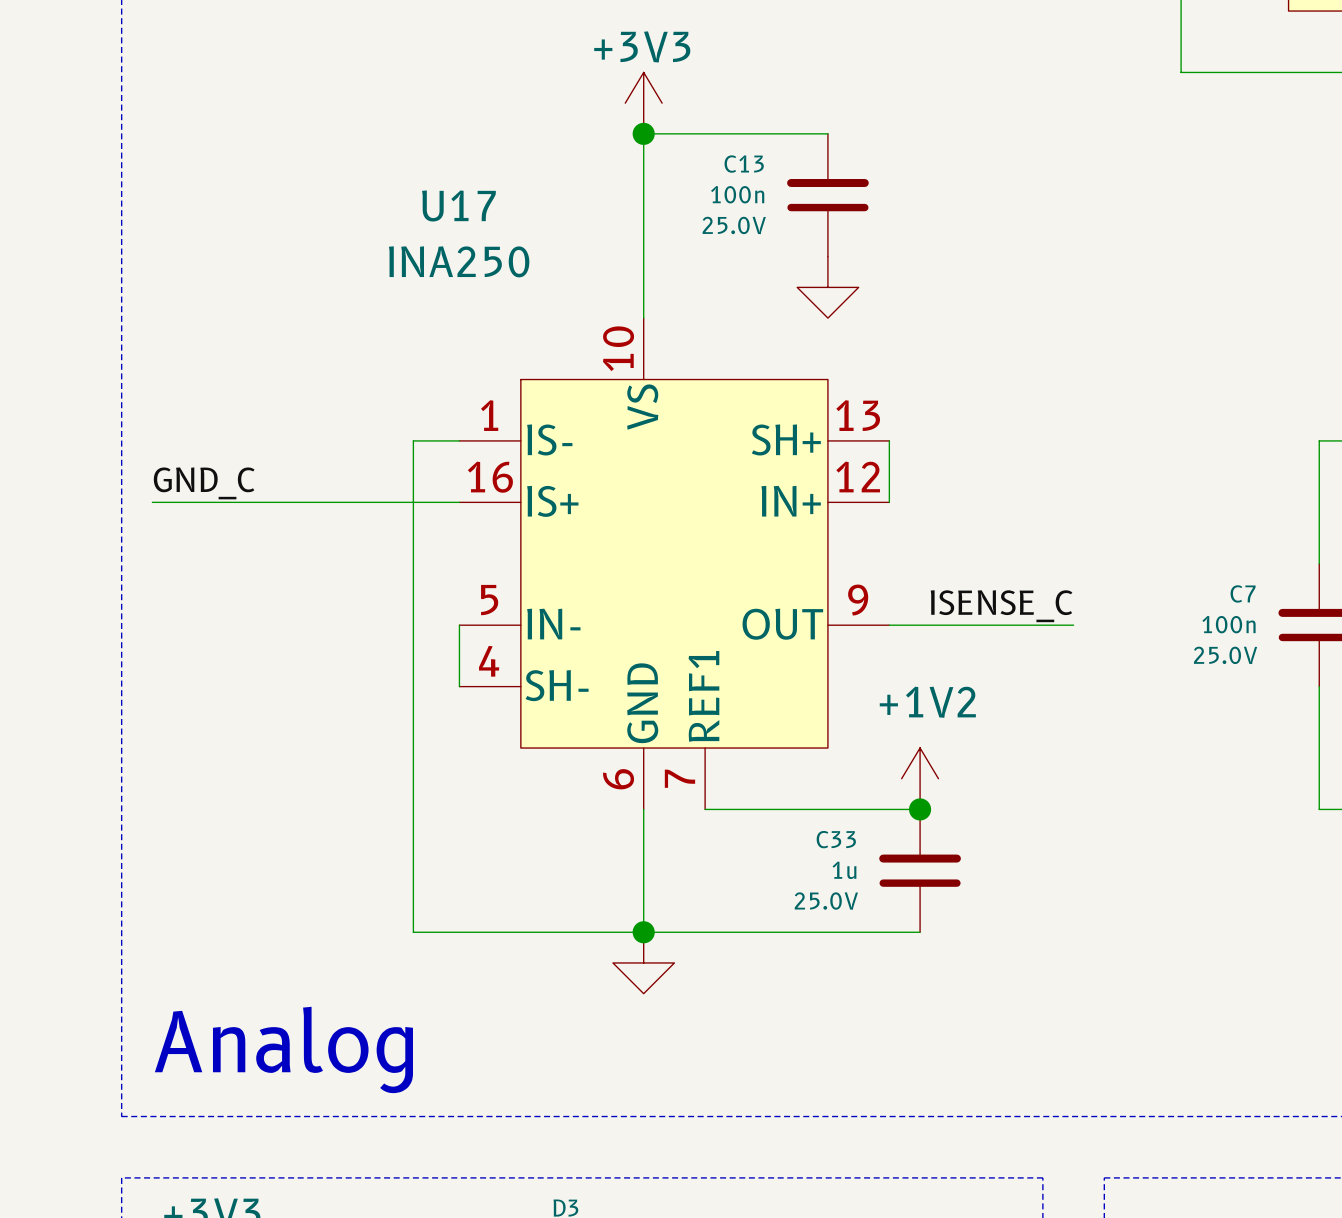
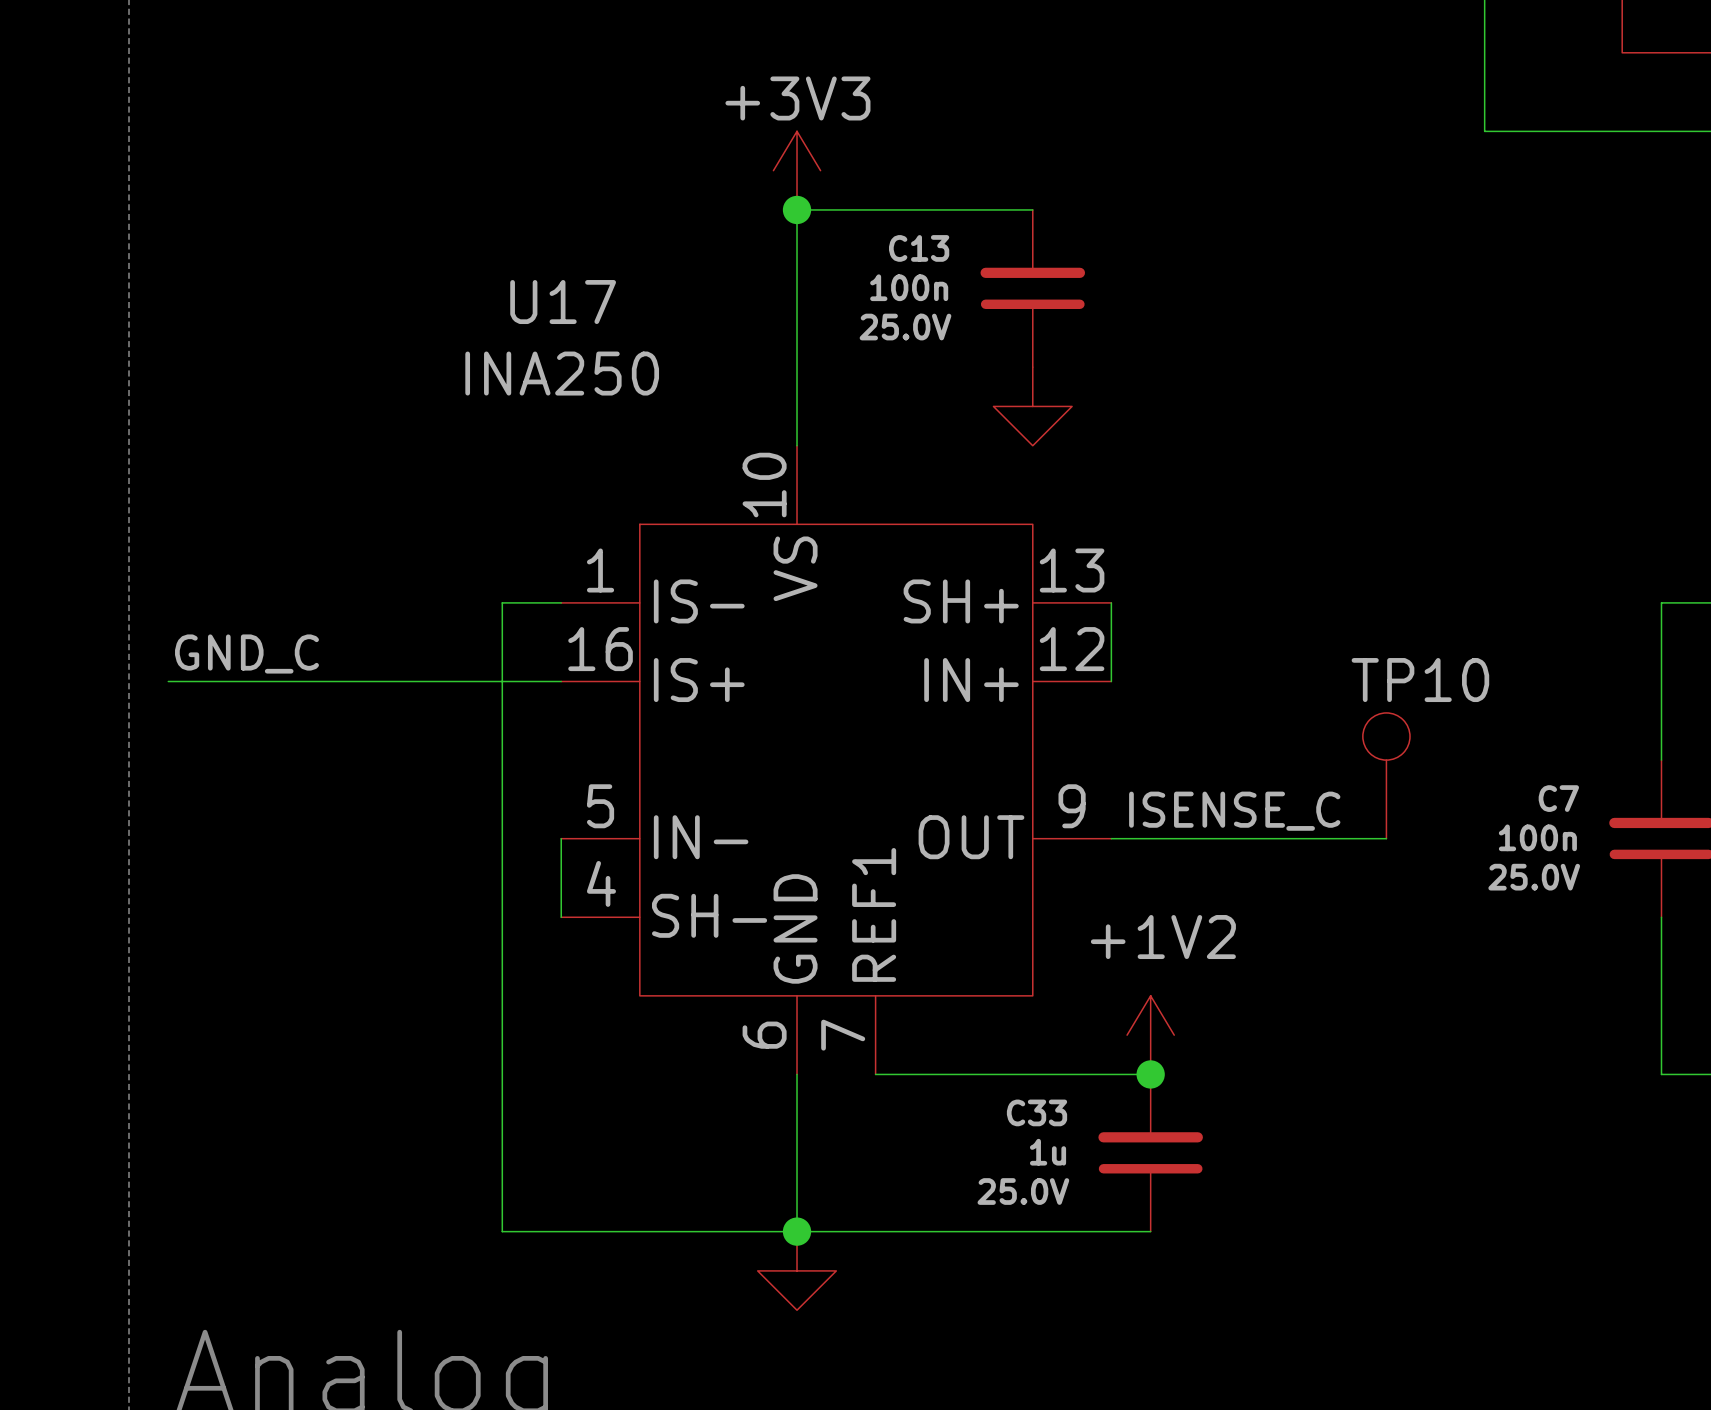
TP10: none -> (1386, 775)
wire: none -> (1347, 838) (1386, 838)

